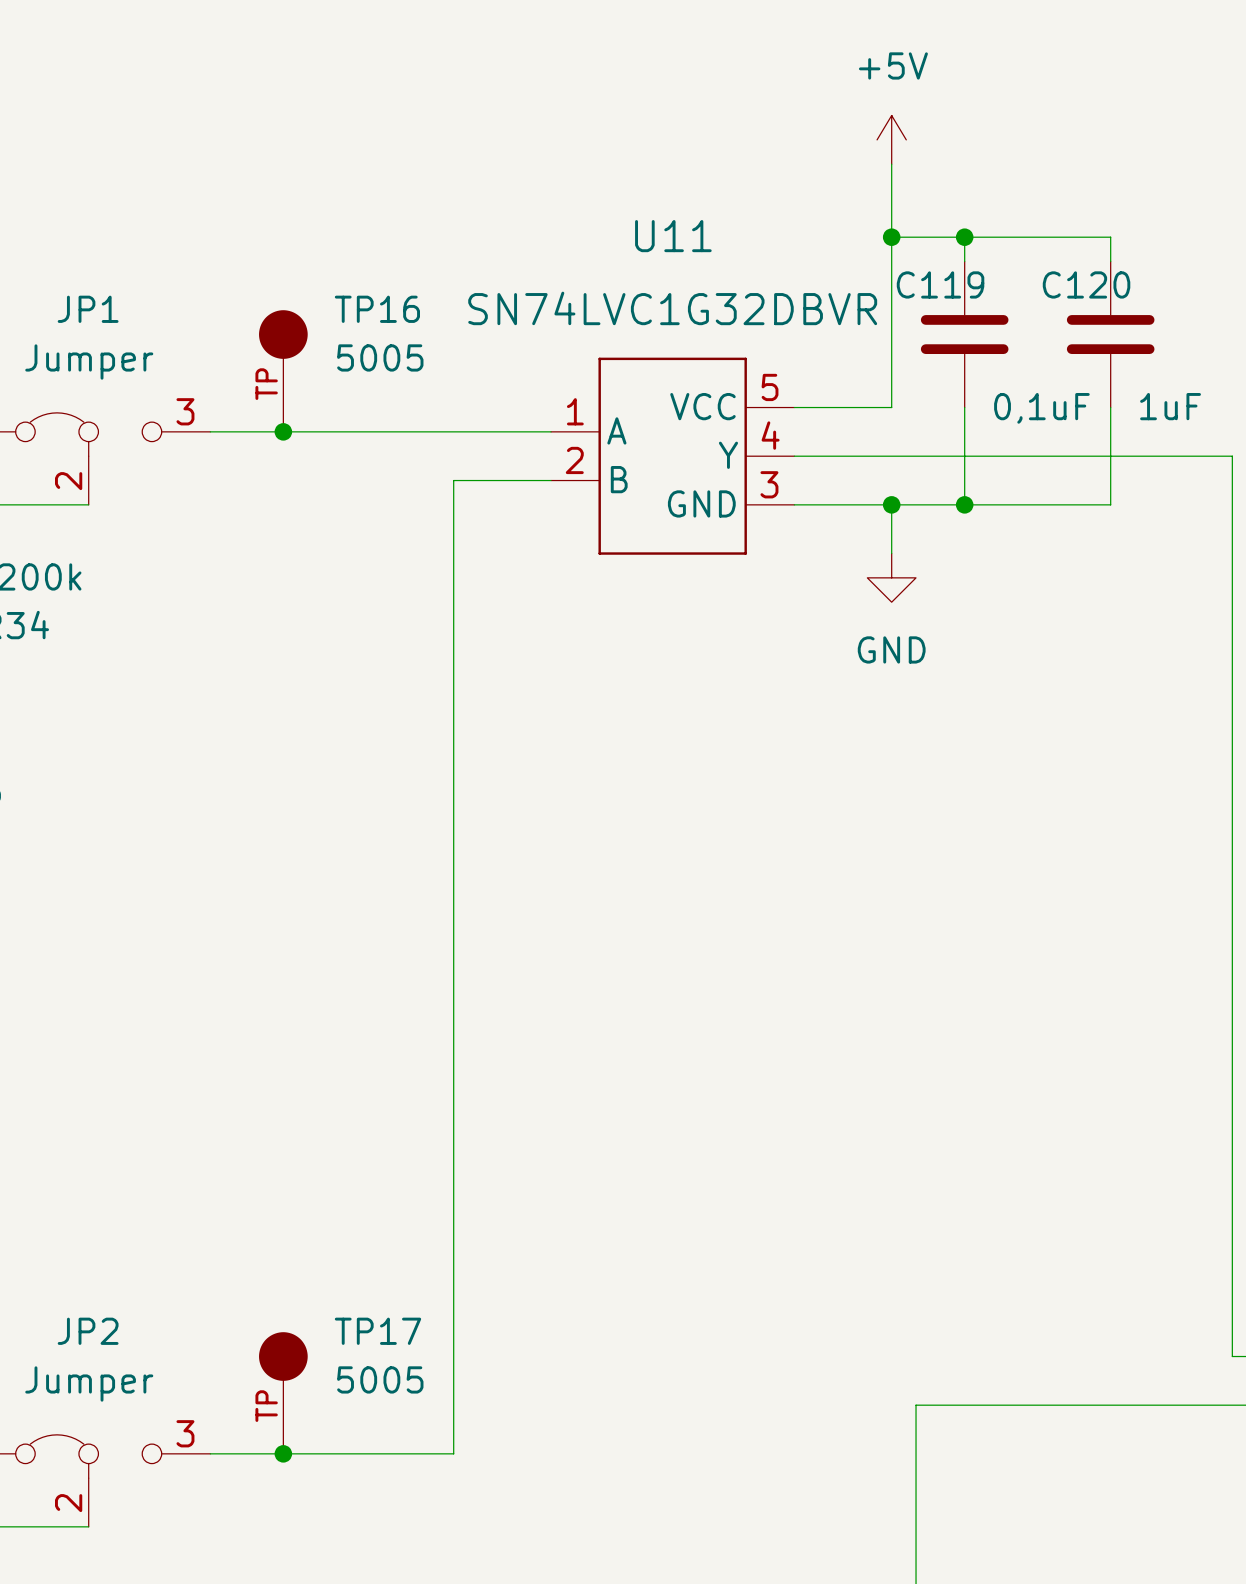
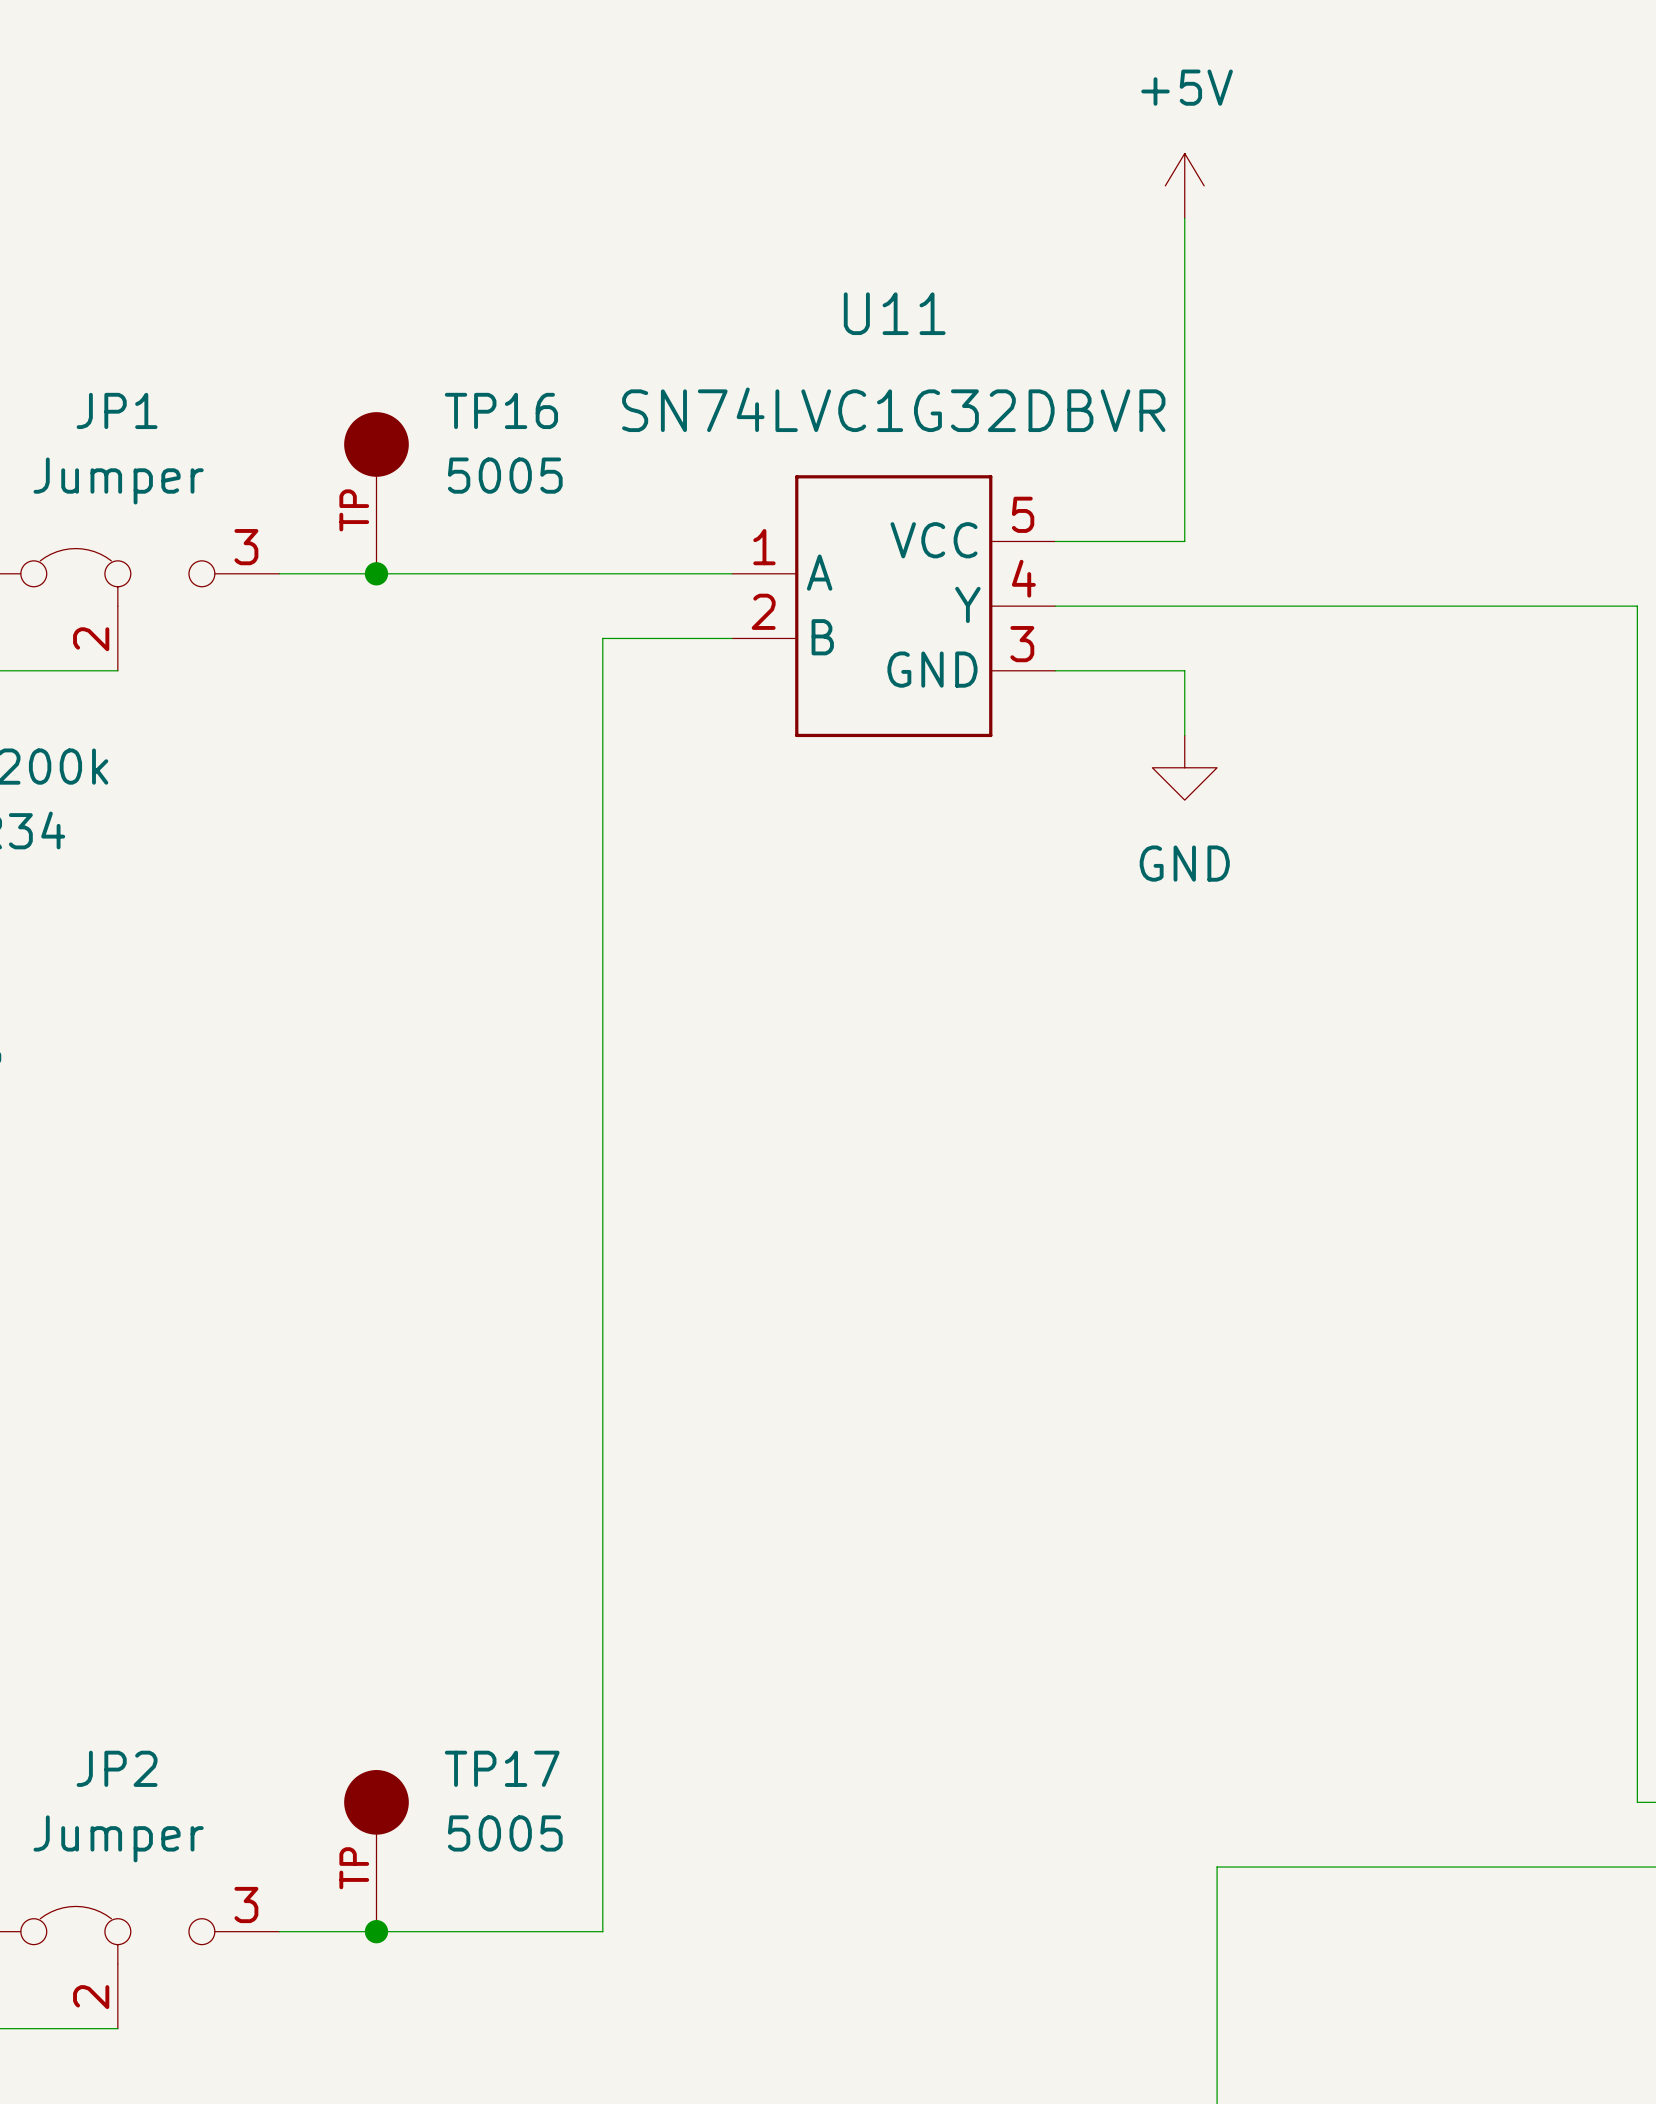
wire: (891, 237) (1110, 237) (1110, 261) -> none
junction: (891, 237) -> none
wire: (964, 237) (964, 261) -> none
junction: (964, 237) -> none
C119: 0,1uF (964, 334) -> none
C120: 1uF (1110, 334) -> none
wire: (964, 407) (964, 504) -> none
wire: (1110, 407) (1110, 504) (891, 504) -> none
junction: (891, 504) -> none
junction: (964, 504) -> none

